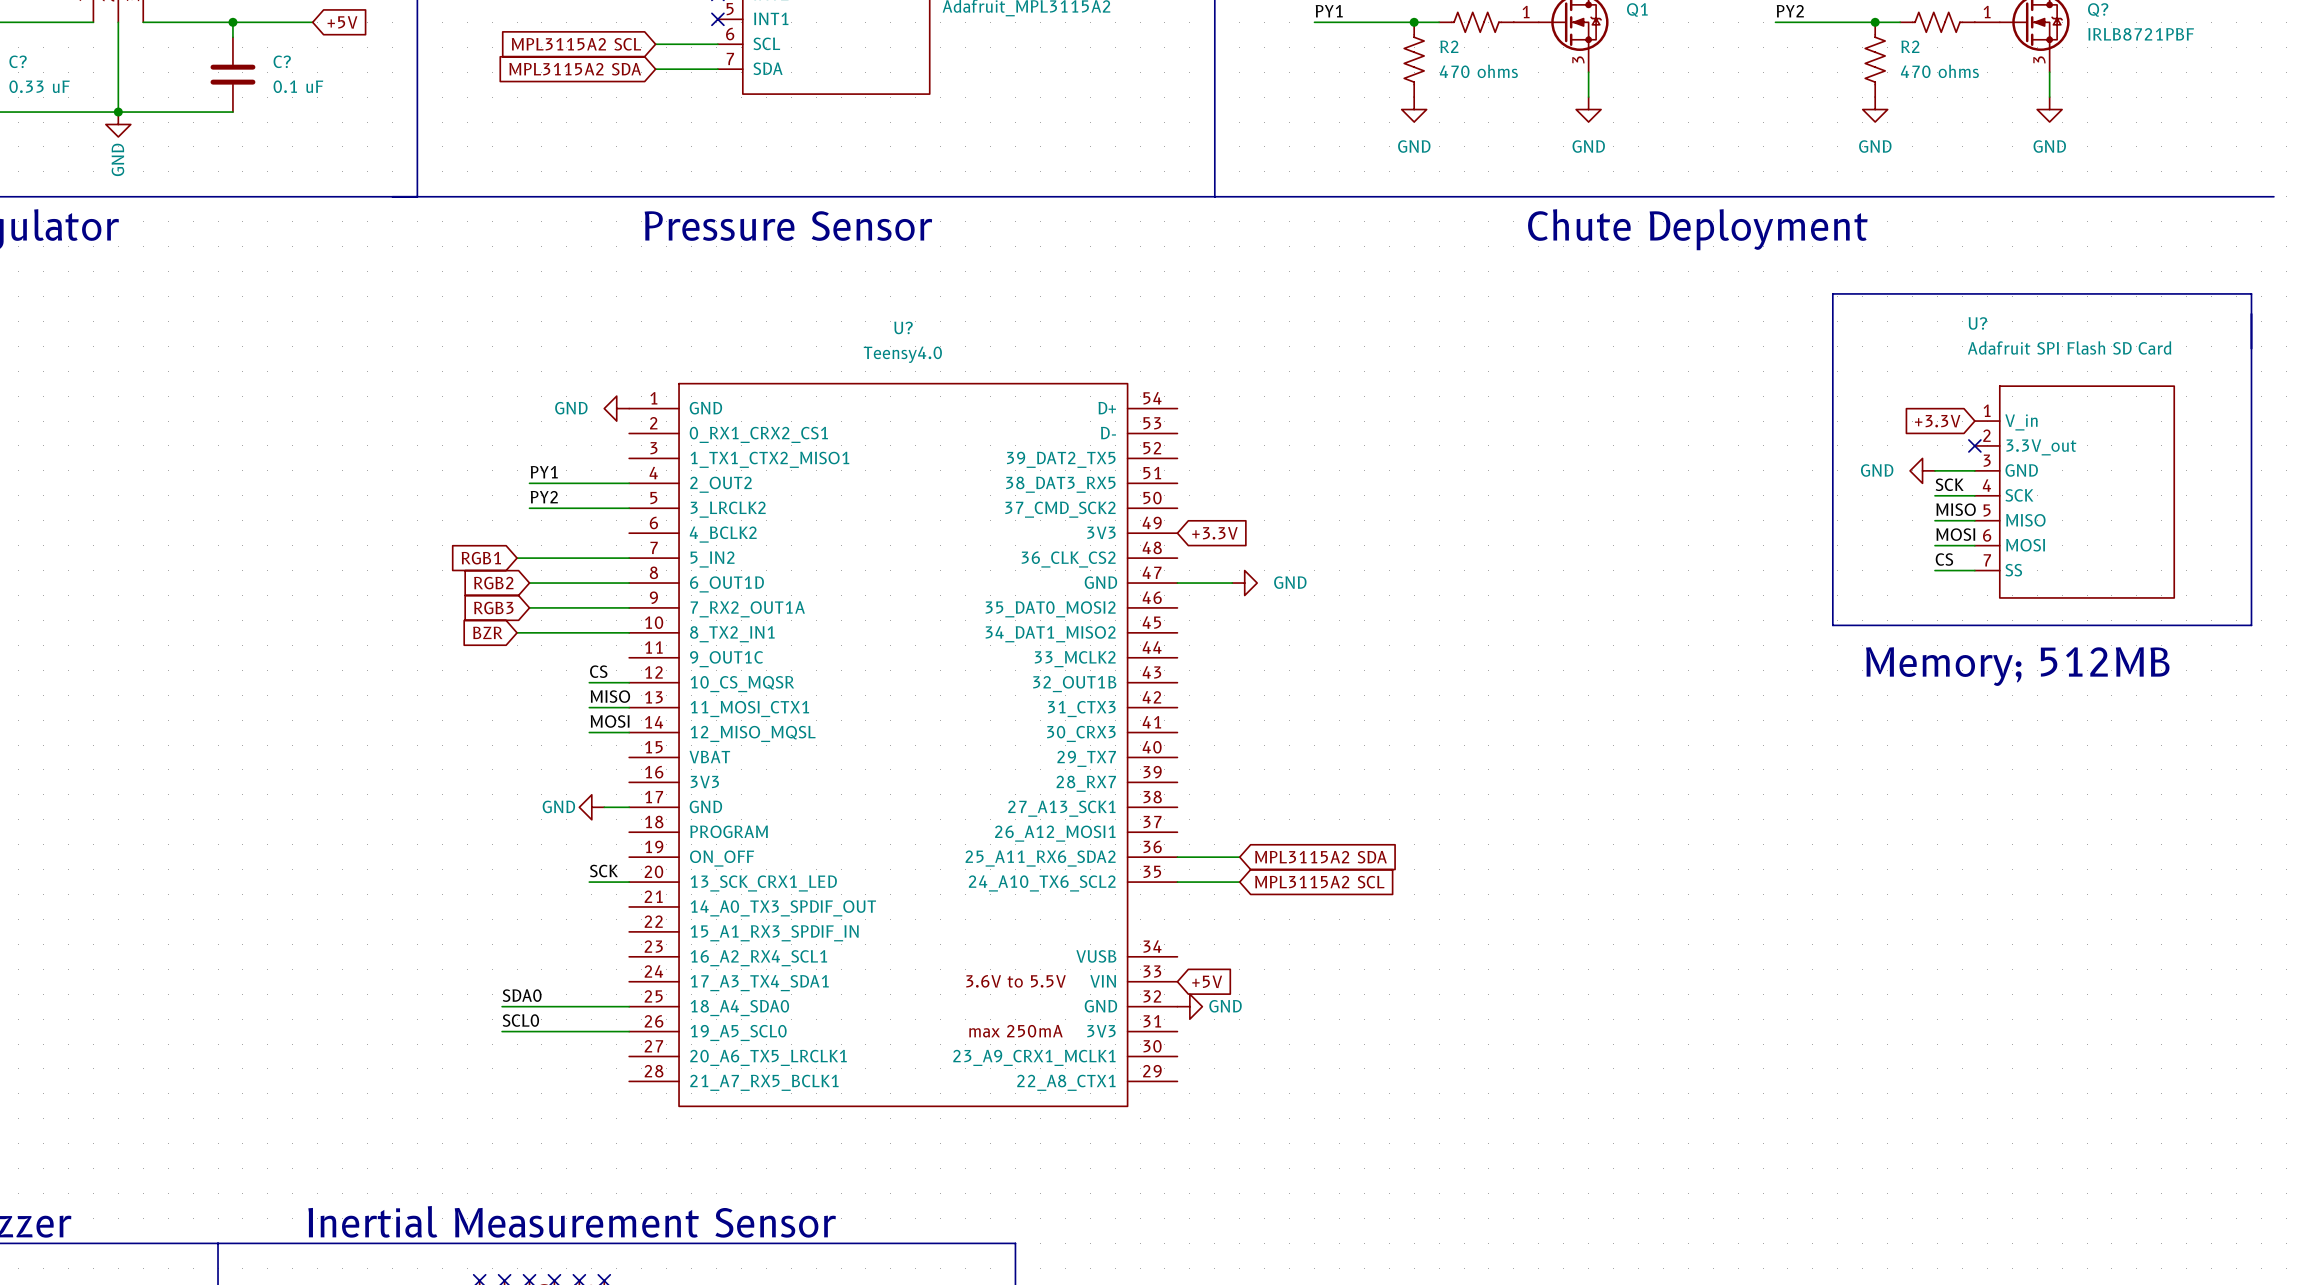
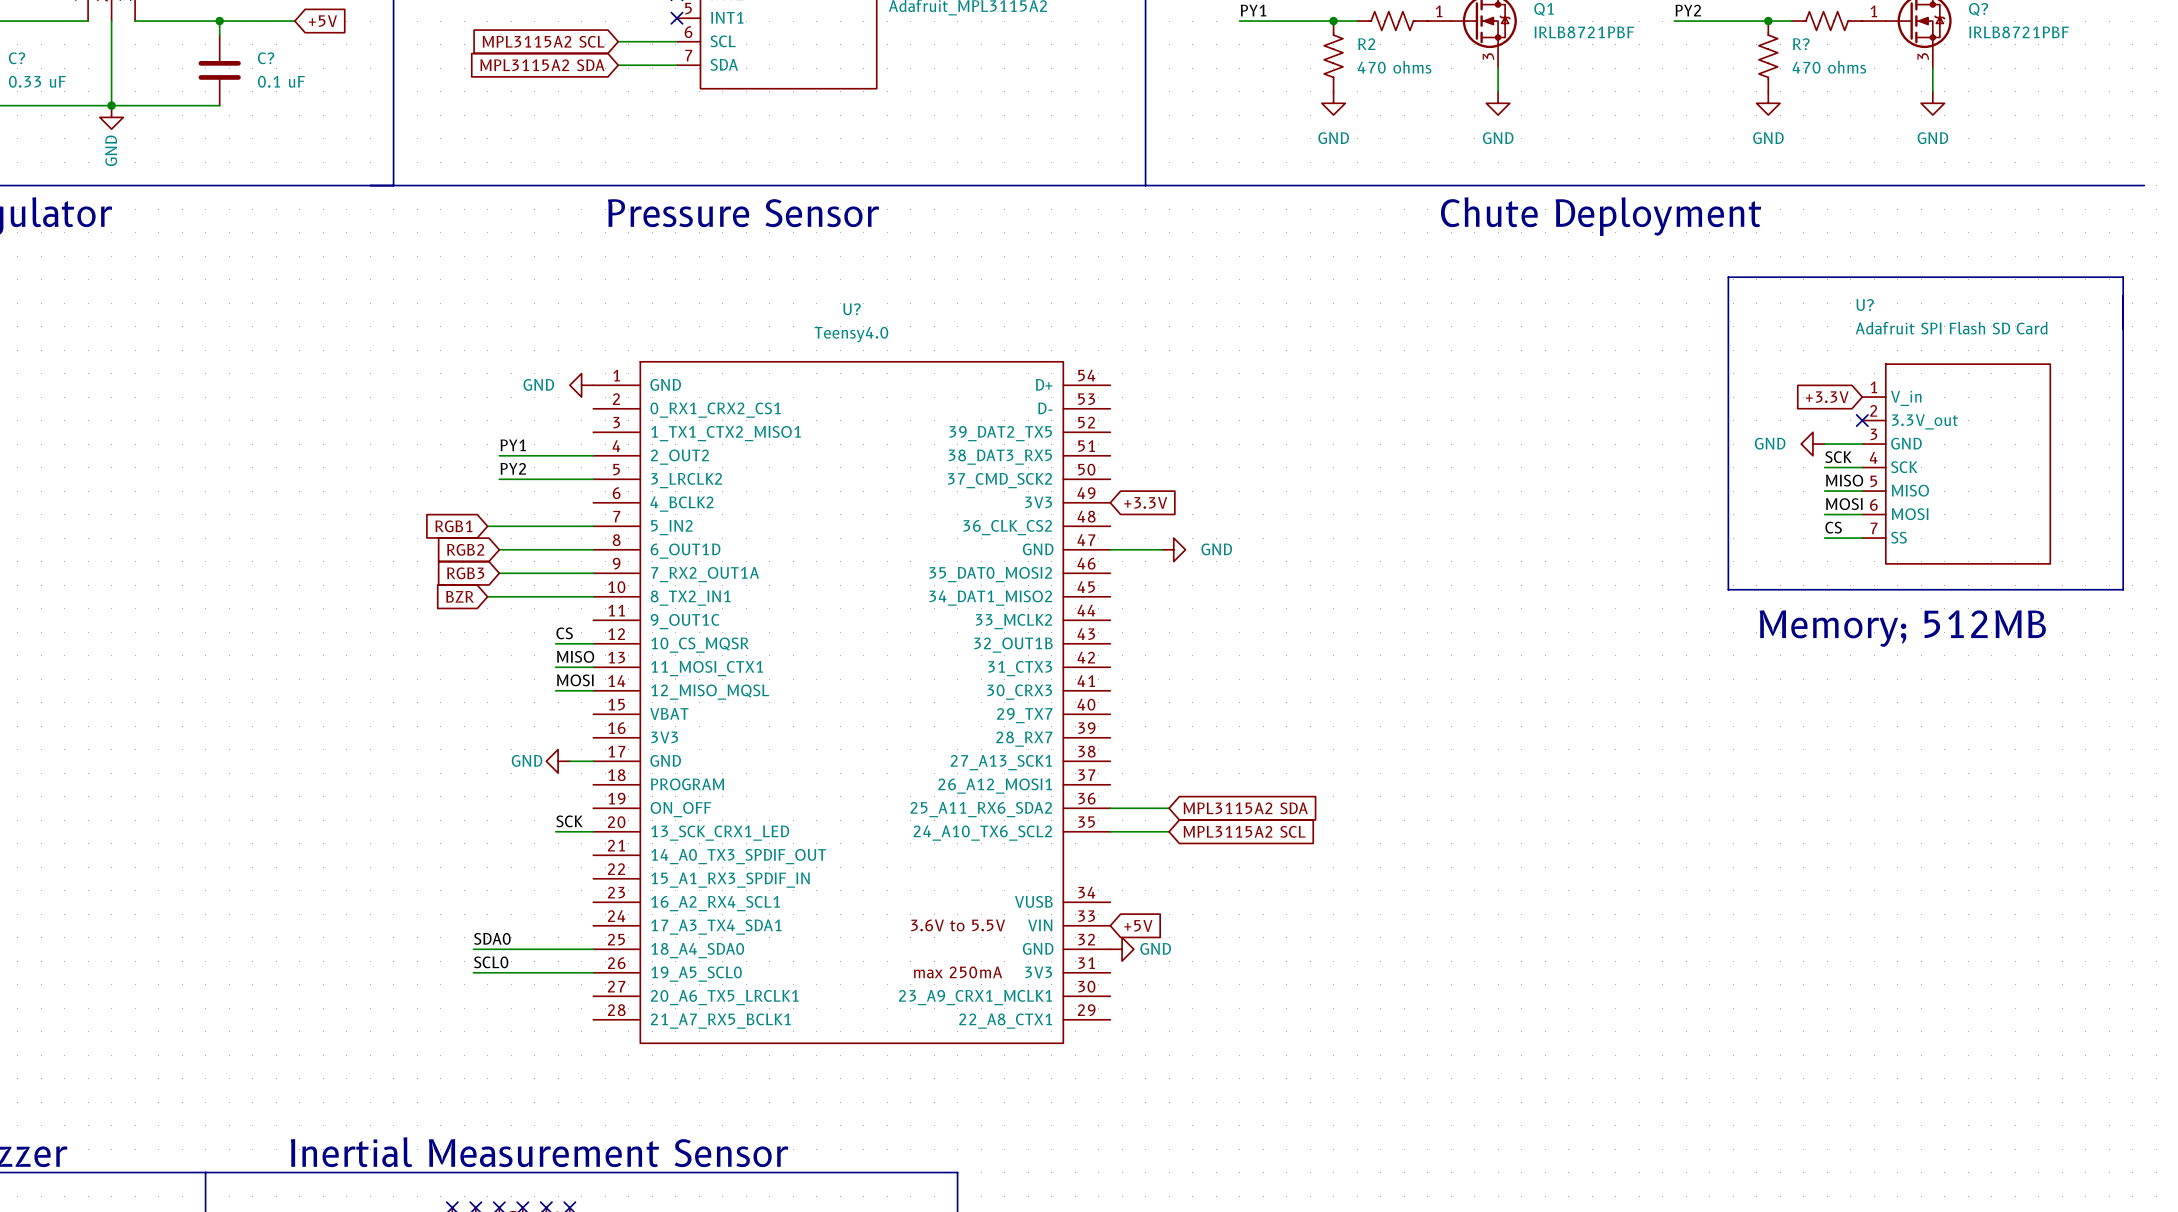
Q1 value: none -> IRLB8721PBF (1584, 32)
R2 name: R2 (1910, 46) -> R? (1801, 44)

